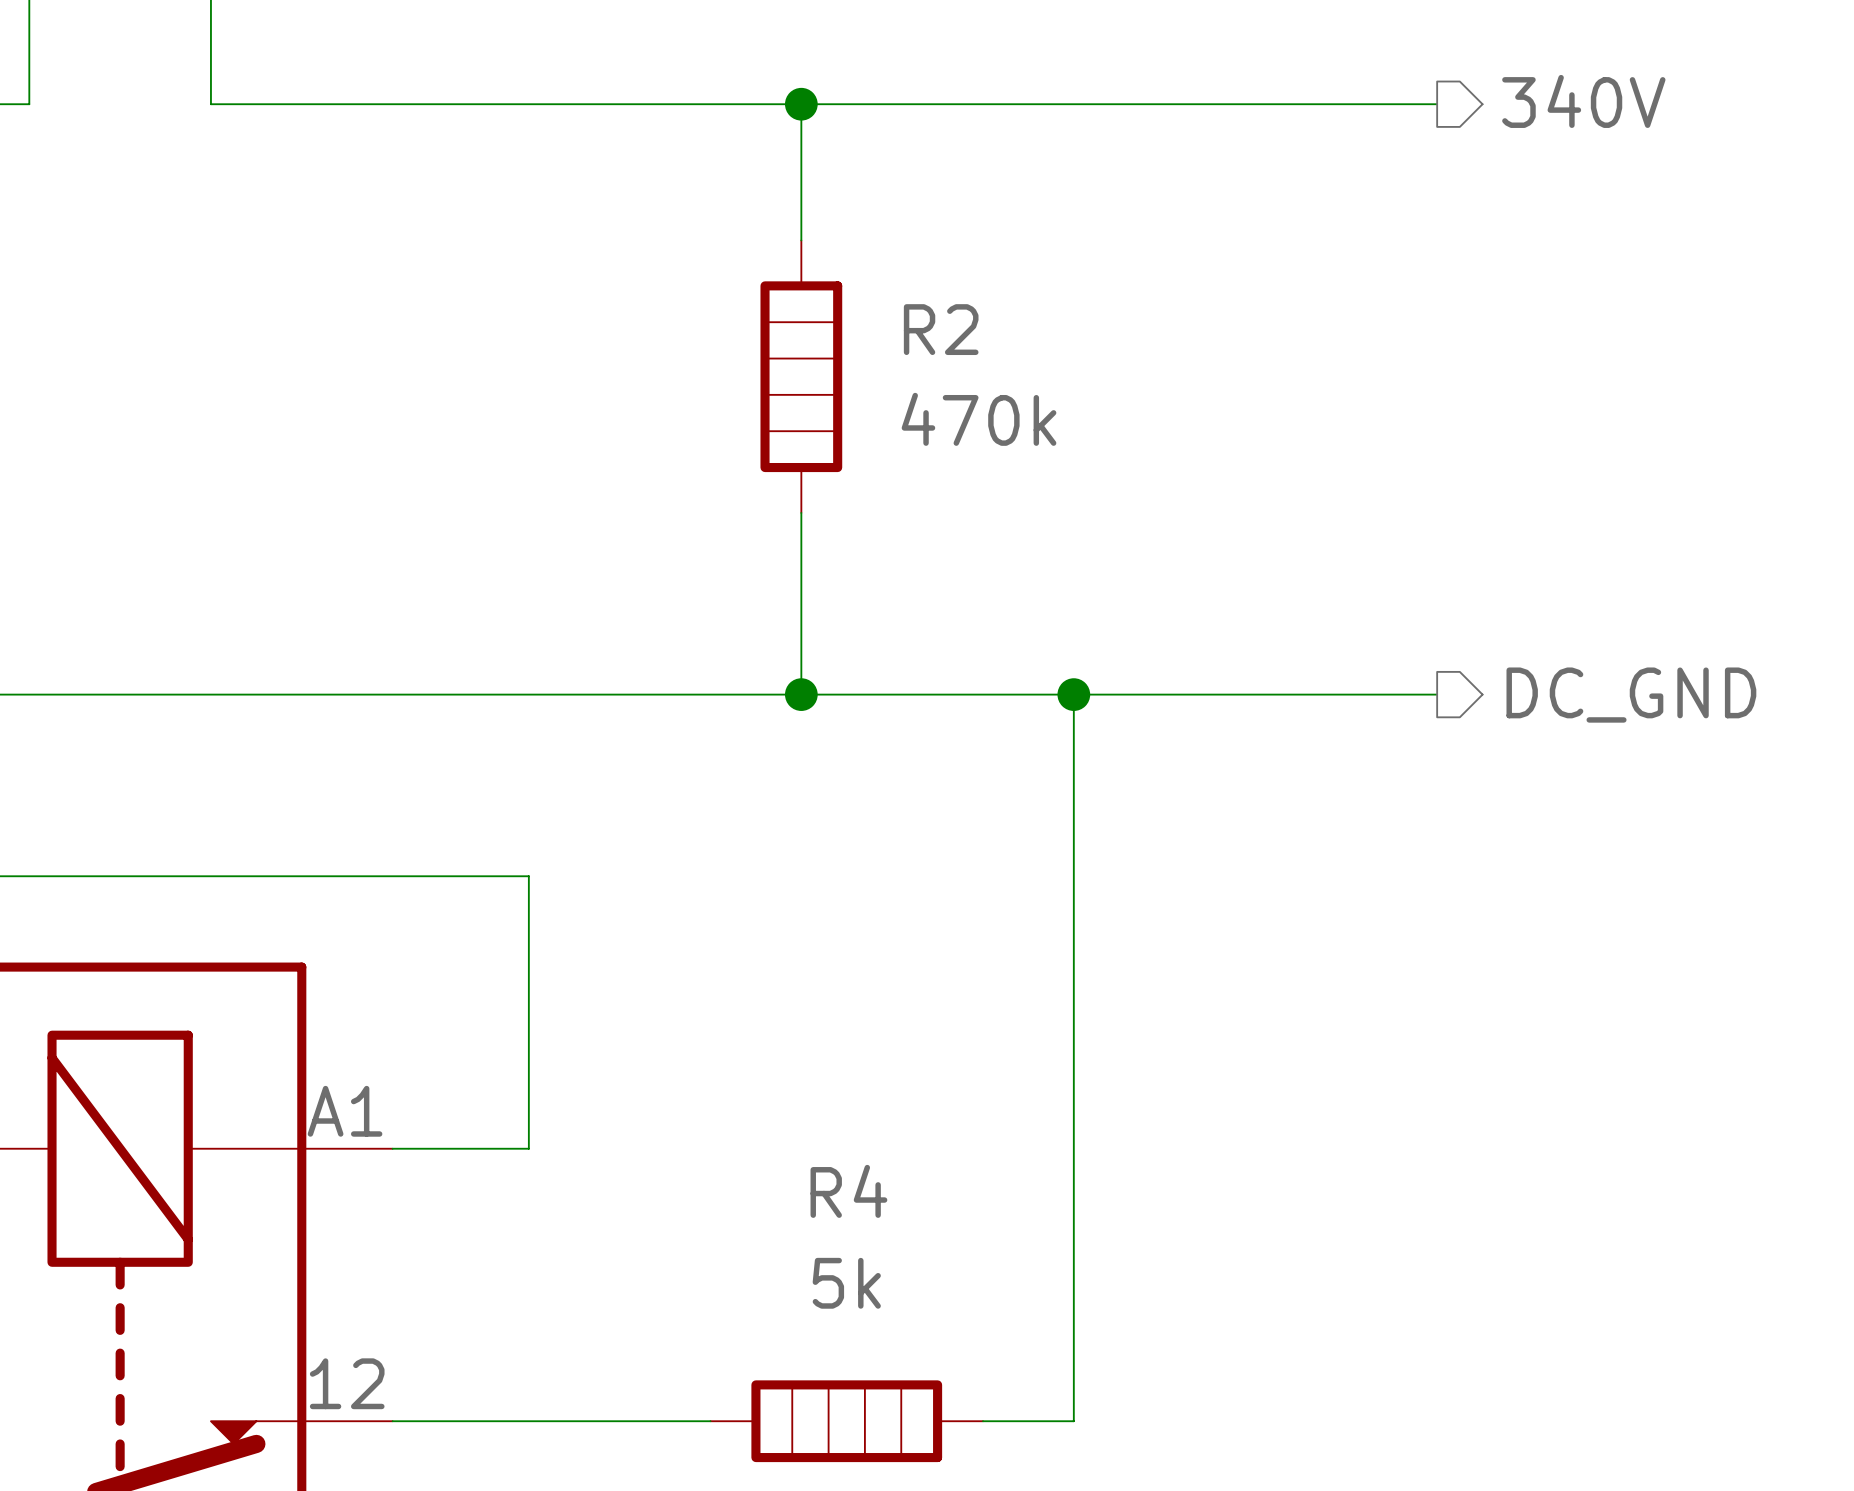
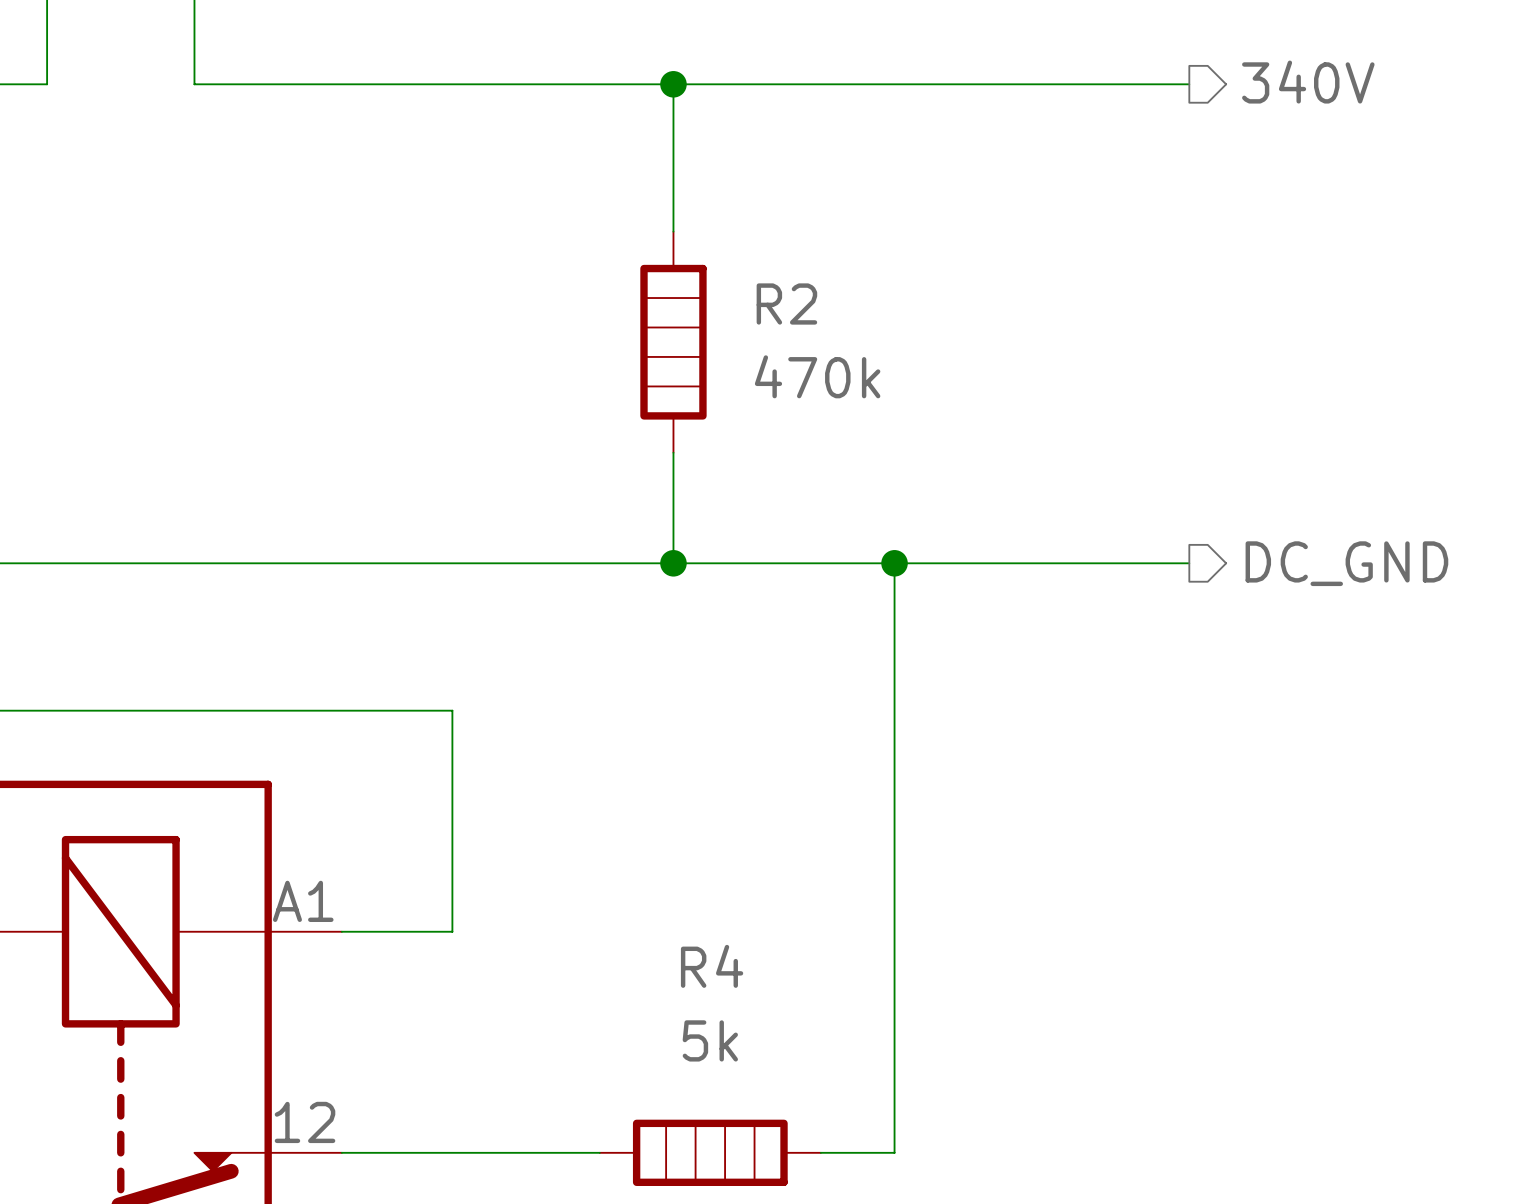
R2 position: (801, 376) -> (673, 342)

